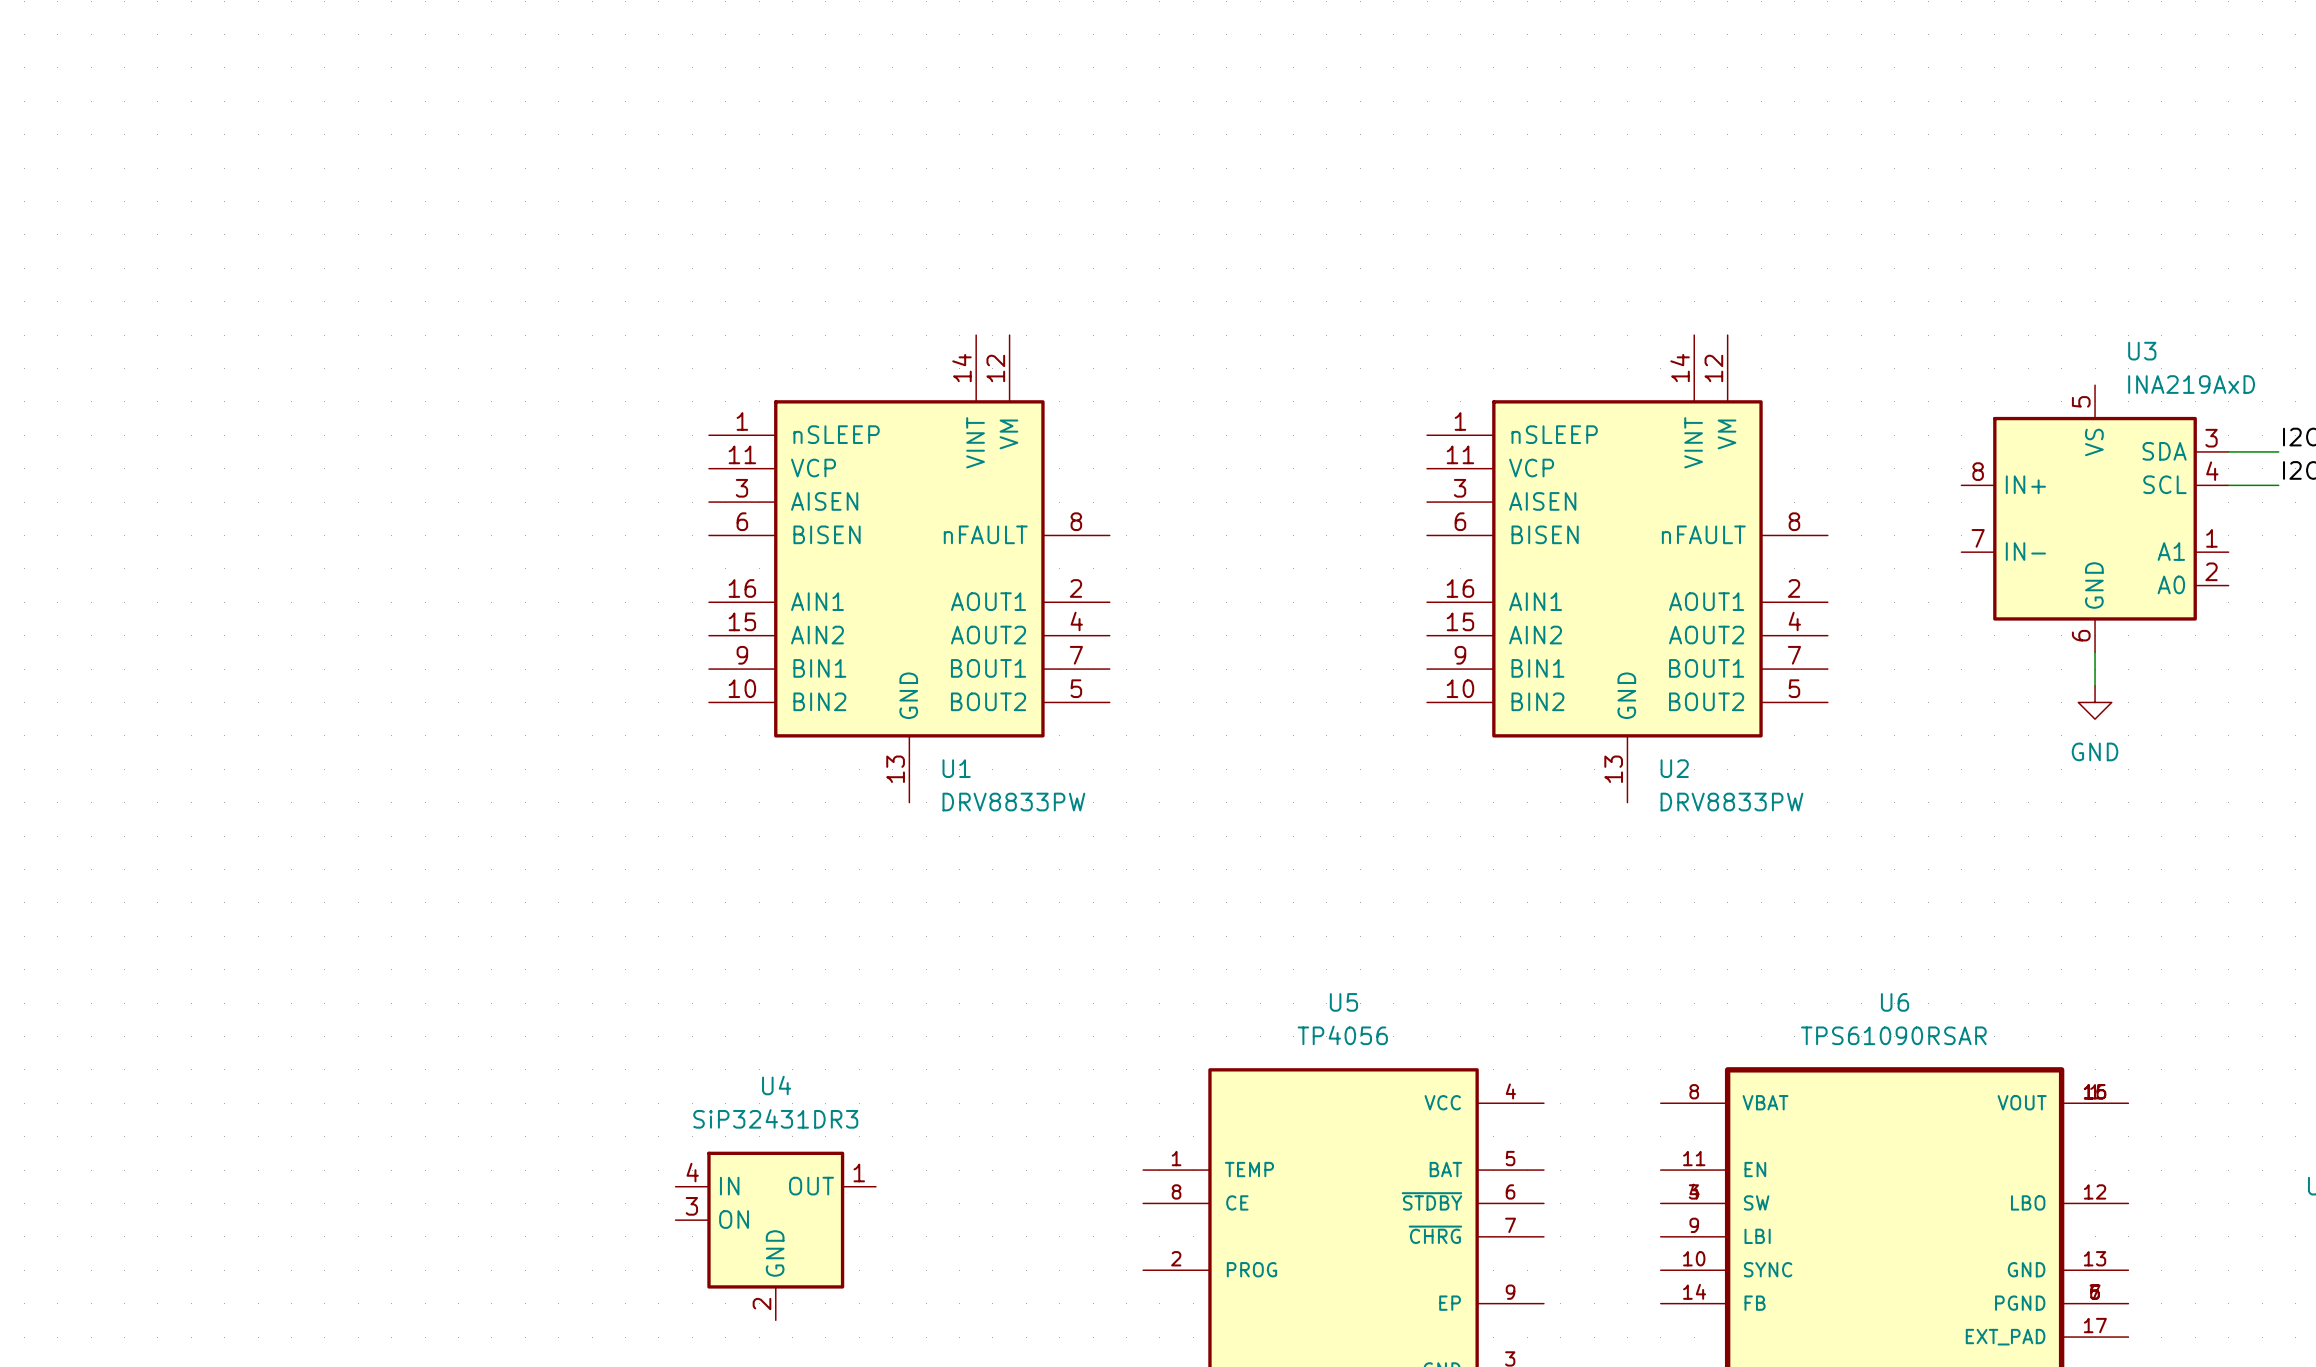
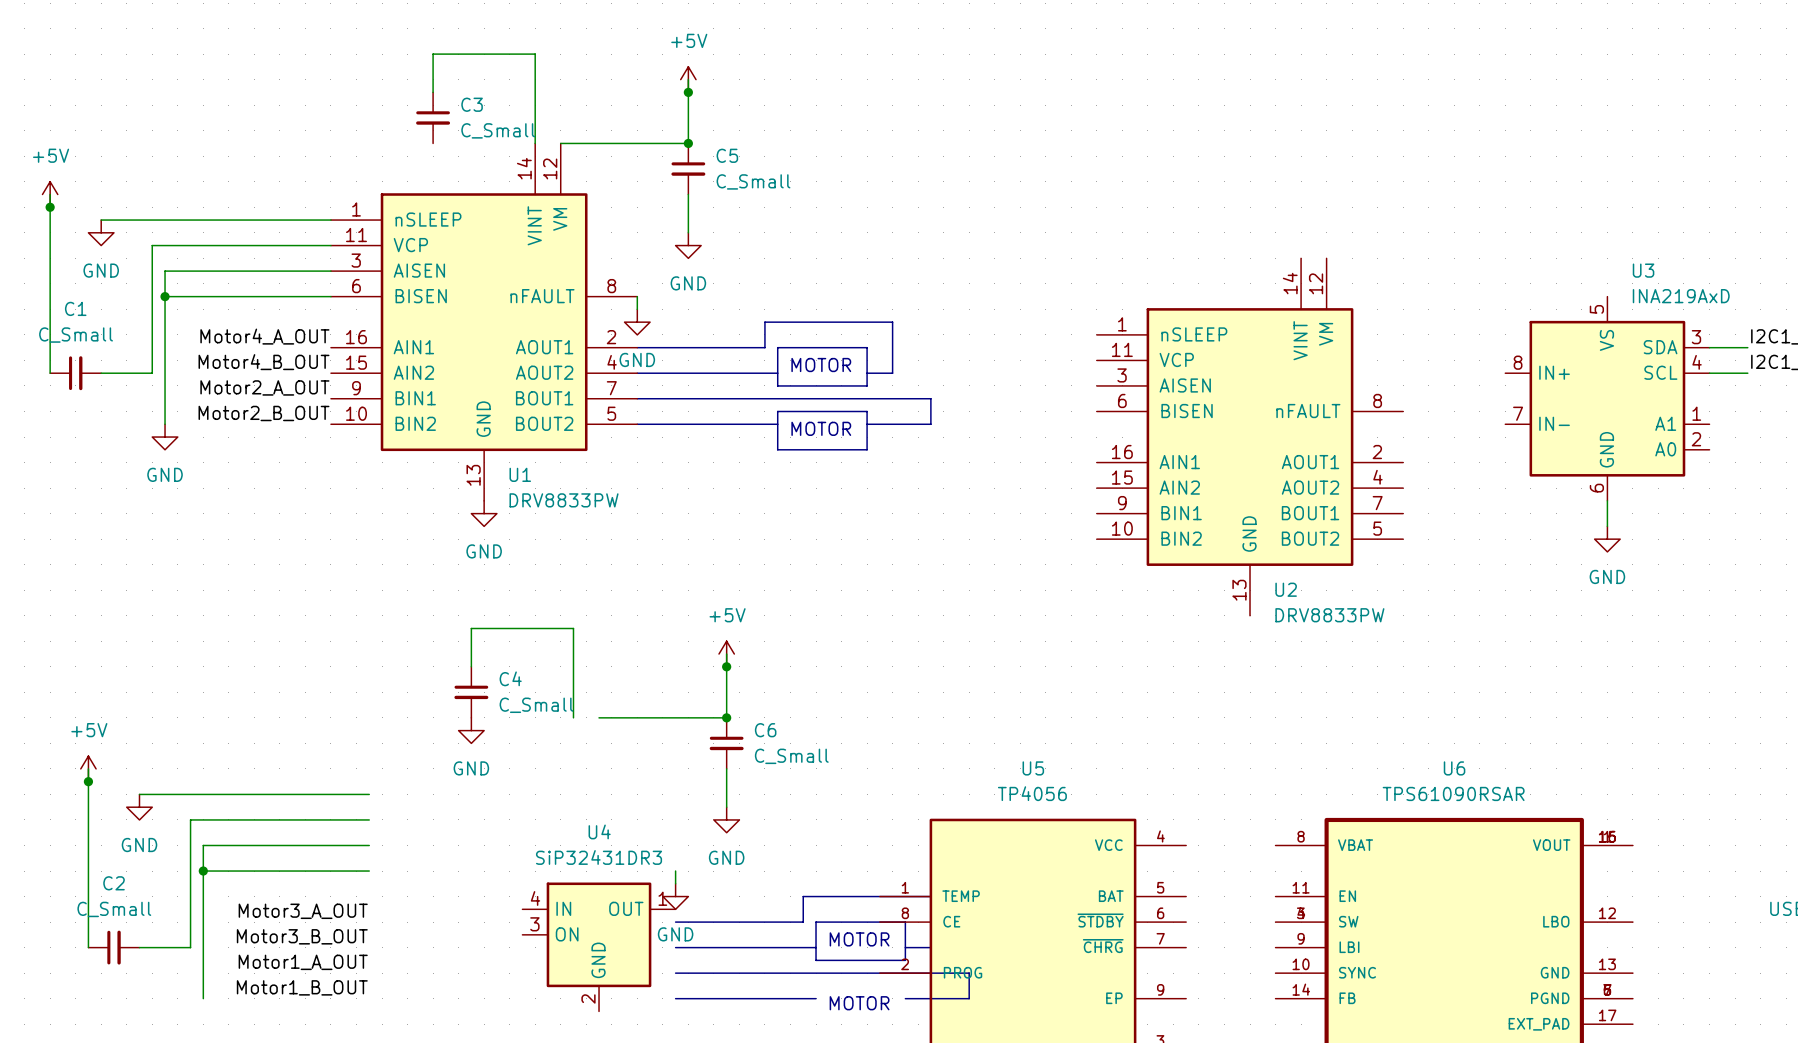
wire: none -> (688, 79) (688, 143) (560, 143)
power symbol: none -> +5V (688, 79)
wire: none -> (433, 92) (433, 54) (535, 54) (535, 143)
junction: none -> (688, 92)
C3: none -> C_Small (433, 117)
junction: none -> (688, 143)
C5: none -> C_Small (688, 168)
wire: none -> (50, 194) (50, 373)
power symbol: none -> +5V (50, 194)
wire: none -> (688, 194) (688, 232)
junction: none -> (50, 207)
wire: none -> (101, 220) (330, 220)
power symbol: none -> GND (101, 232)
wire: none -> (330, 245) (152, 245) (152, 373) (101, 373)
power symbol: none -> GND (688, 245)
wire: none -> (330, 271) (165, 271) (165, 424)
wire: none -> (165, 296) (330, 296)
junction: none -> (165, 296)
wire: none -> (637, 296) (637, 309)
power symbol: none -> GND (637, 322)
label: none -> Motor4_A_OUT (264, 336)
line: none -> (637, 347) (764, 347) (764, 322) (892, 322) (892, 373) (867, 373)
line: none -> (777, 347) (867, 347) (867, 385) (777, 385) (777, 347)
label: none -> Motor4_B_OUT (264, 362)
text: none -> MOTOR (821, 365)
C1: none -> C_Small (75, 373)
line: none -> (637, 373) (777, 373)
label: none -> Motor2_A_OUT (264, 387)
line: none -> (637, 398) (930, 398) (930, 424) (867, 424)
line: none -> (777, 411) (867, 411) (867, 449) (777, 449) (777, 411)
label: none -> Motor2_B_OUT (264, 413)
line: none -> (637, 424) (777, 424)
text: none -> MOTOR (821, 428)
power symbol: none -> GND (165, 437)
U1 position: (909, 568) -> (484, 322)
power symbol: none -> GND (484, 513)
wire: none -> (726, 654) (726, 717) (599, 717)
power symbol: none -> +5V (726, 654)
wire: none -> (471, 666) (471, 628) (573, 628) (573, 717)
junction: none -> (726, 666)
C4: none -> C_Small (471, 692)
junction: none -> (726, 717)
power symbol: none -> GND (471, 730)
C6: none -> C_Small (726, 743)
wire: none -> (88, 768) (88, 947)
power symbol: none -> +5V (88, 768)
wire: none -> (726, 768) (726, 807)
junction: none -> (88, 781)
wire: none -> (139, 794) (369, 794)
power symbol: none -> GND (139, 807)
wire: none -> (369, 819) (190, 819) (190, 947) (139, 947)
power symbol: none -> GND (726, 819)
wire: none -> (369, 845) (203, 845) (203, 998)
wire: none -> (203, 871) (369, 871)
junction: none -> (203, 871)
wire: none -> (675, 871) (675, 883)
power symbol: none -> GND (675, 896)
label: none -> Motor3_A_OUT (303, 911)
line: none -> (675, 922) (803, 922) (803, 896) (930, 896) (930, 947) (905, 947)
line: none -> (816, 922) (905, 922) (905, 960) (816, 960) (816, 922)
label: none -> Motor3_B_OUT (302, 936)
text: none -> MOTOR (859, 939)
C2: none -> C_Small (113, 947)
line: none -> (675, 947) (816, 947)
label: none -> Motor1_A_OUT (303, 962)
line: none -> (675, 973) (969, 973) (969, 998) (905, 998)
label: none -> Motor1_B_OUT (302, 987)
line: none -> (675, 998) (816, 998)
text: none -> MOTOR (859, 1003)

